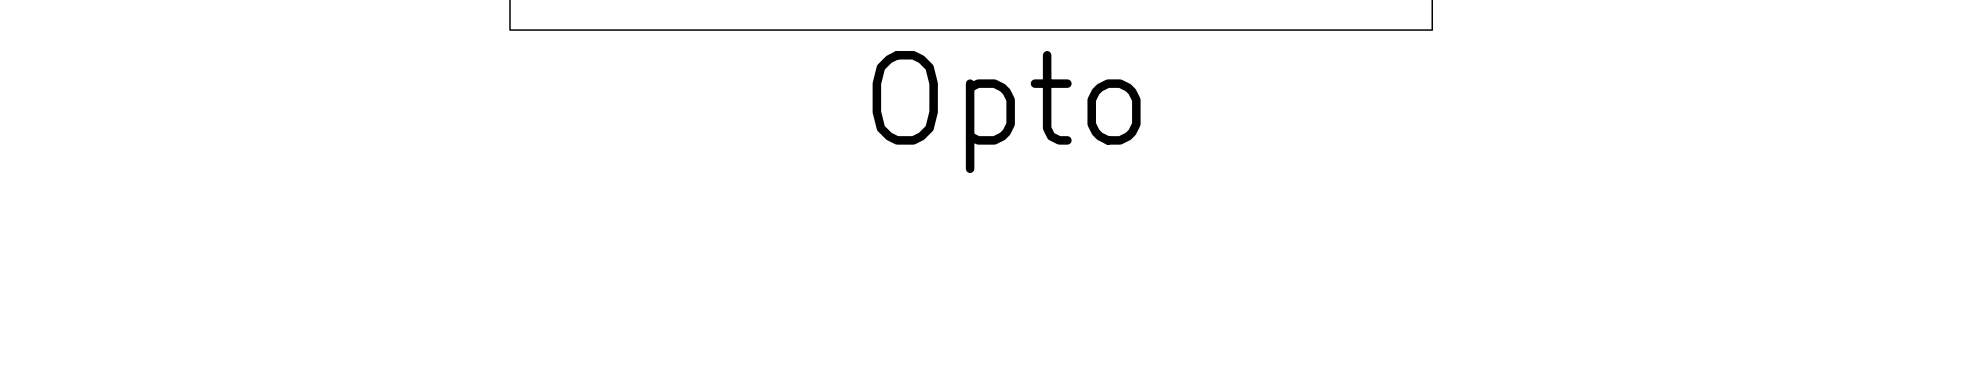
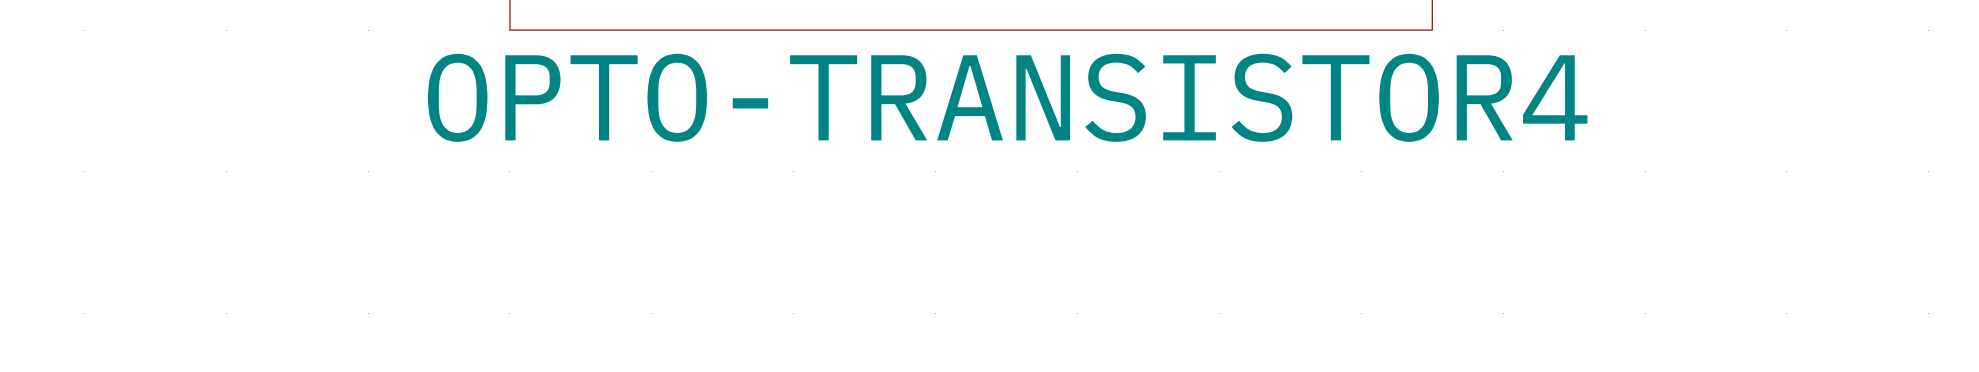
part value: Opto (1006, 112) -> OPTO-TRANSISTOR4 (1007, 97)

